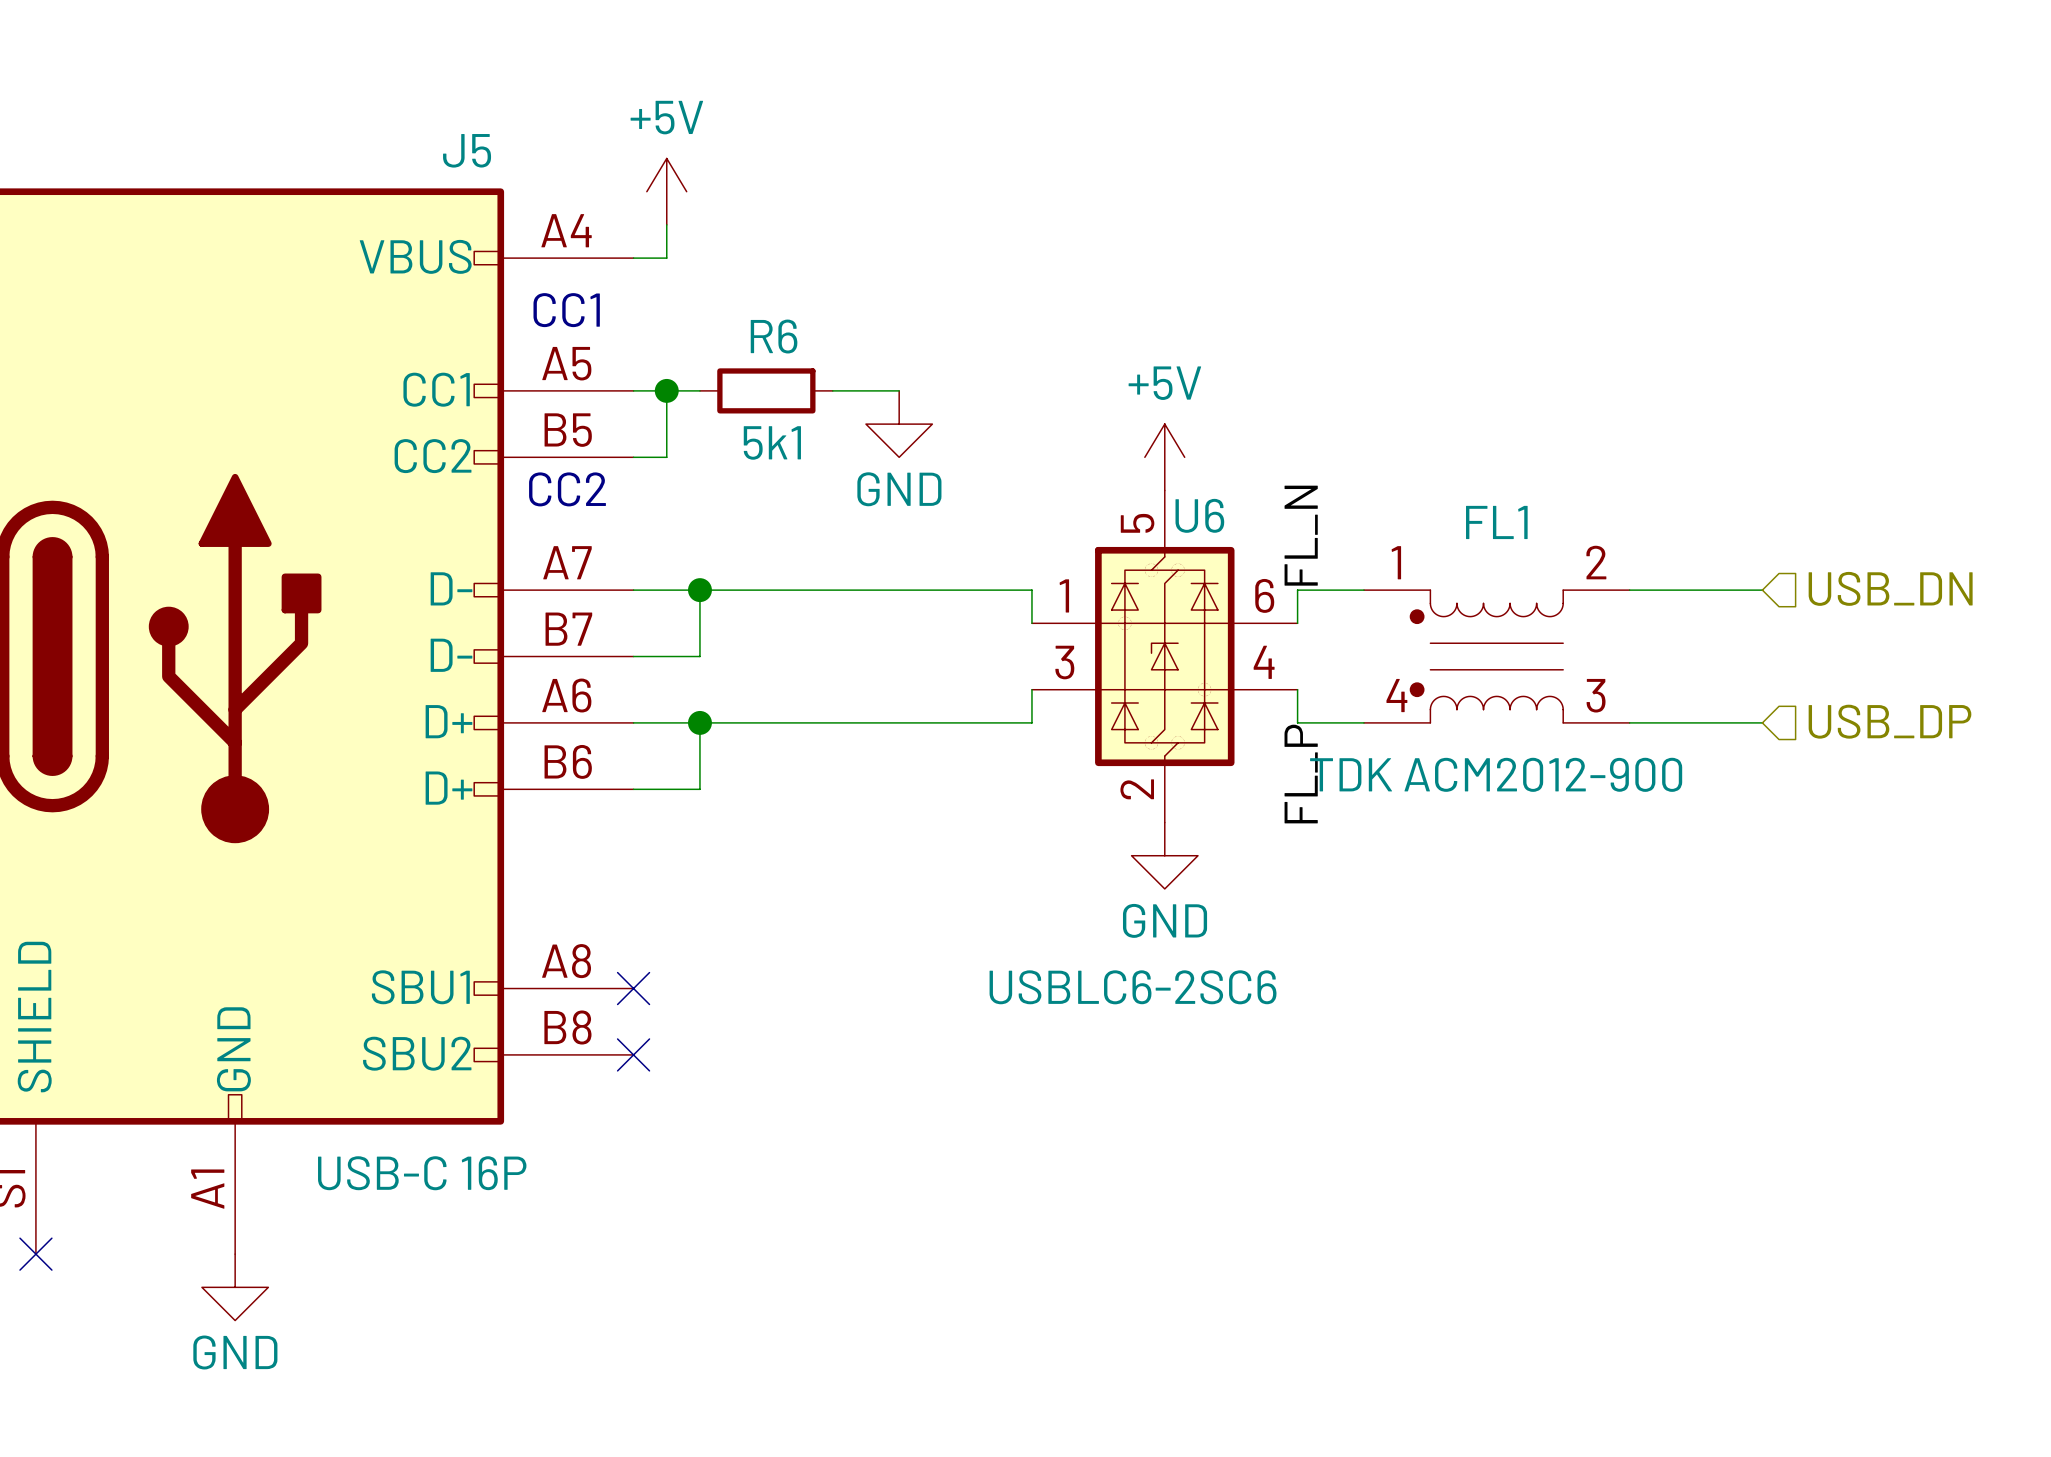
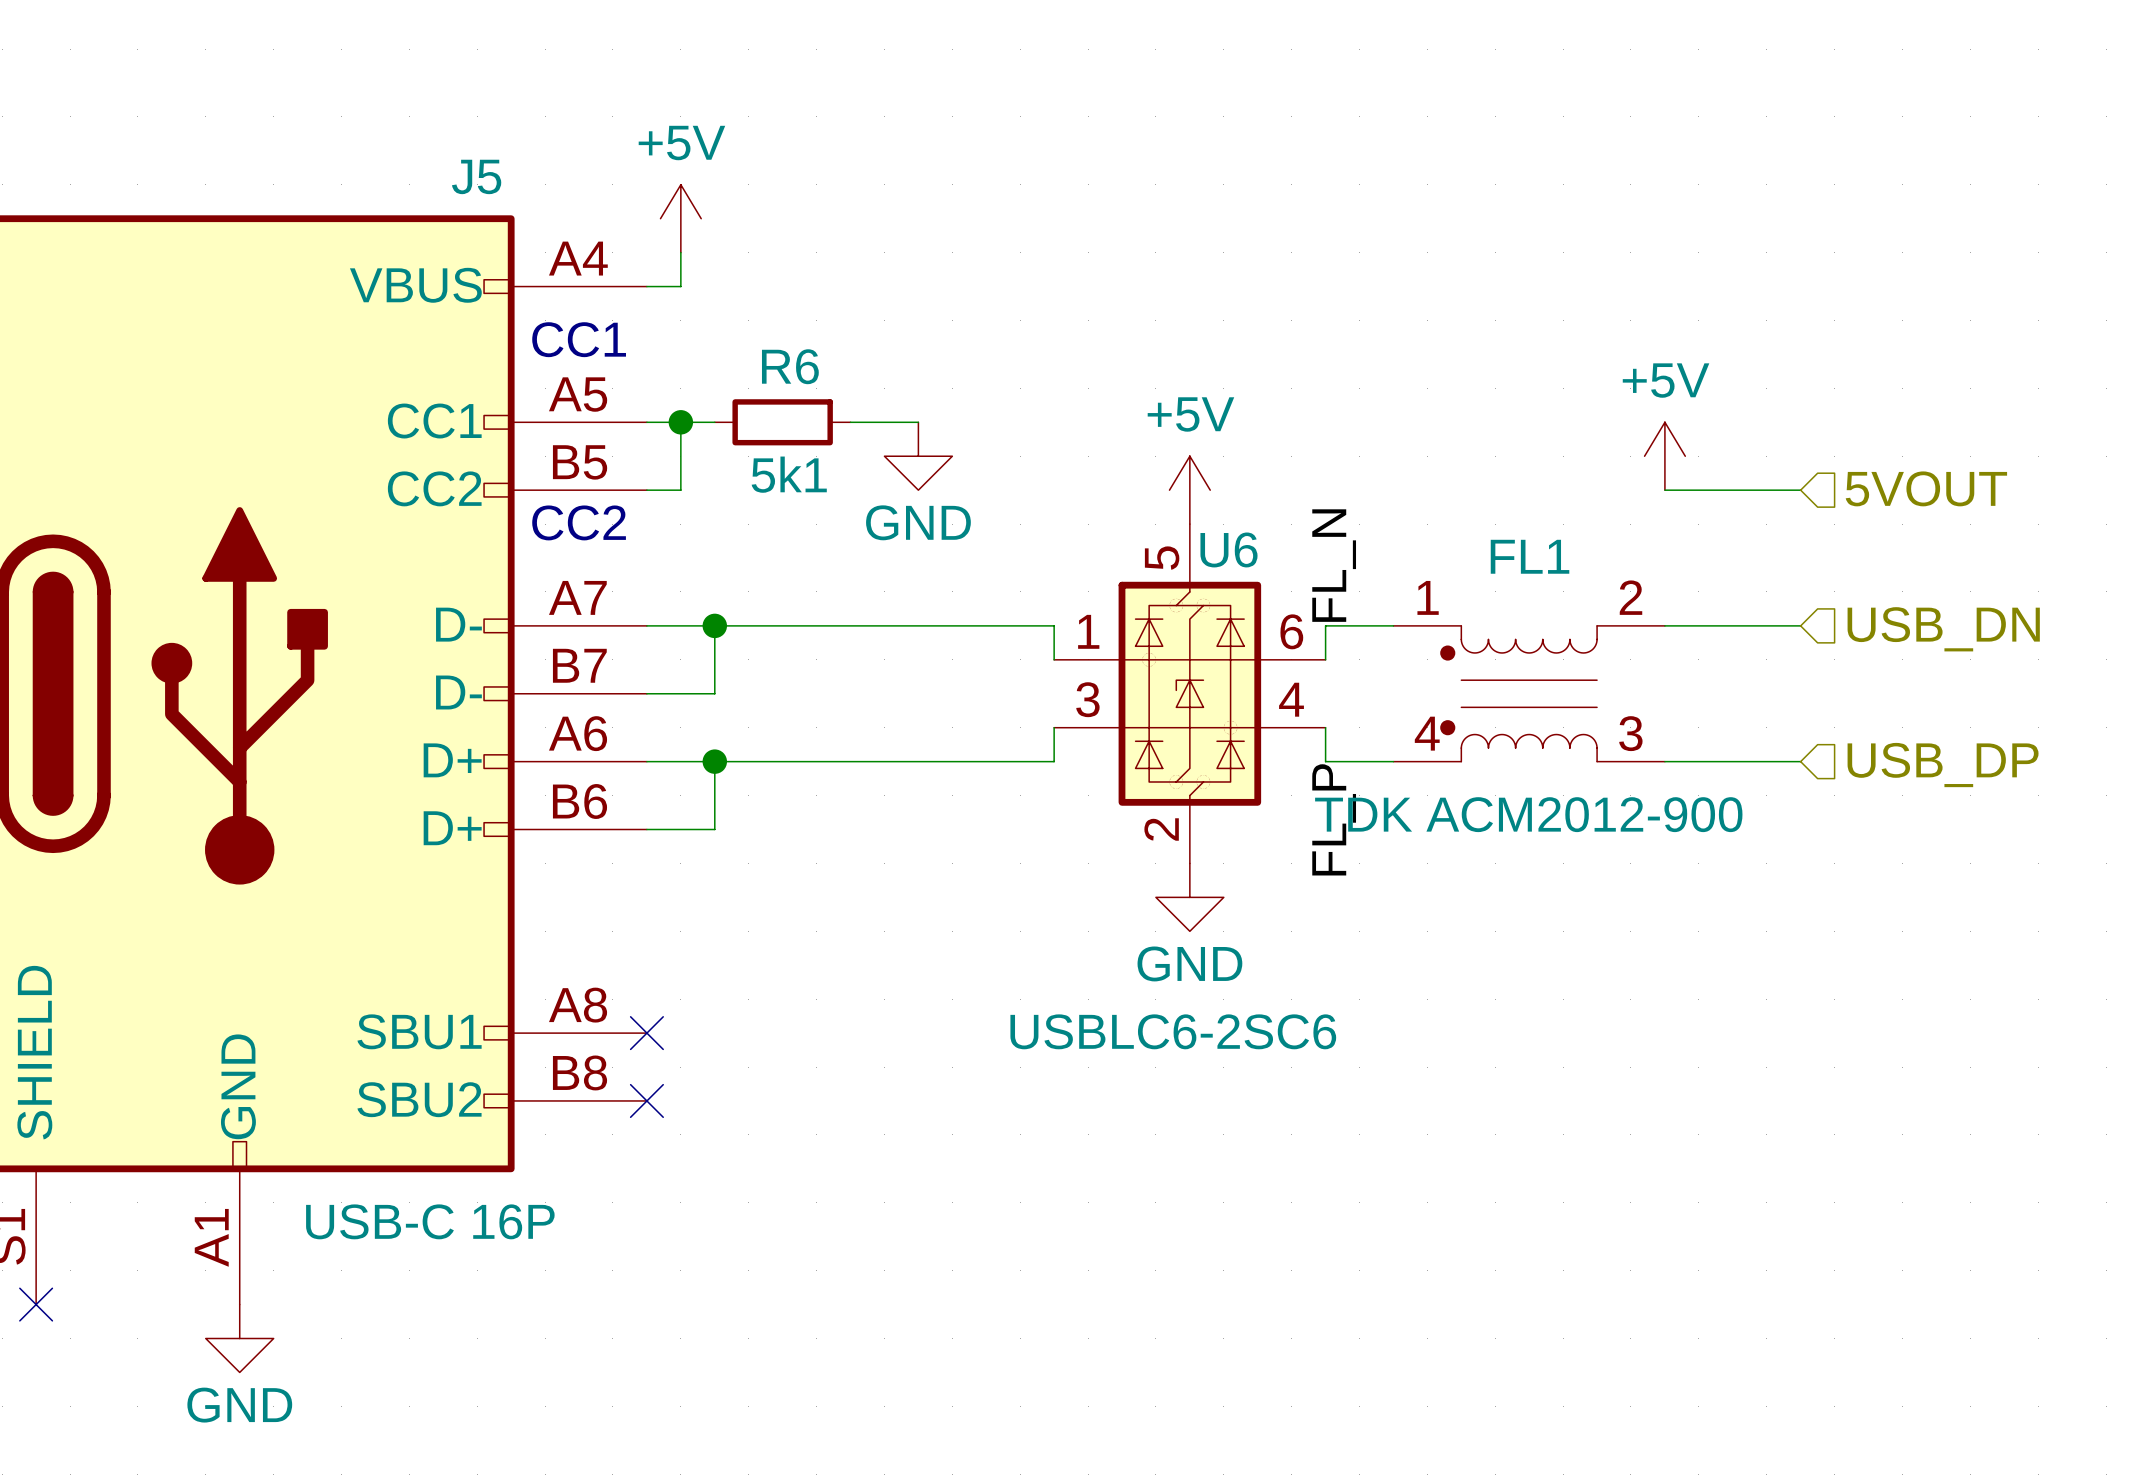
power symbol: none -> +5V (1664, 456)
hierarchical label: none -> 5VOUT (1926, 488)
wire: none -> (1664, 490) (1800, 490)

